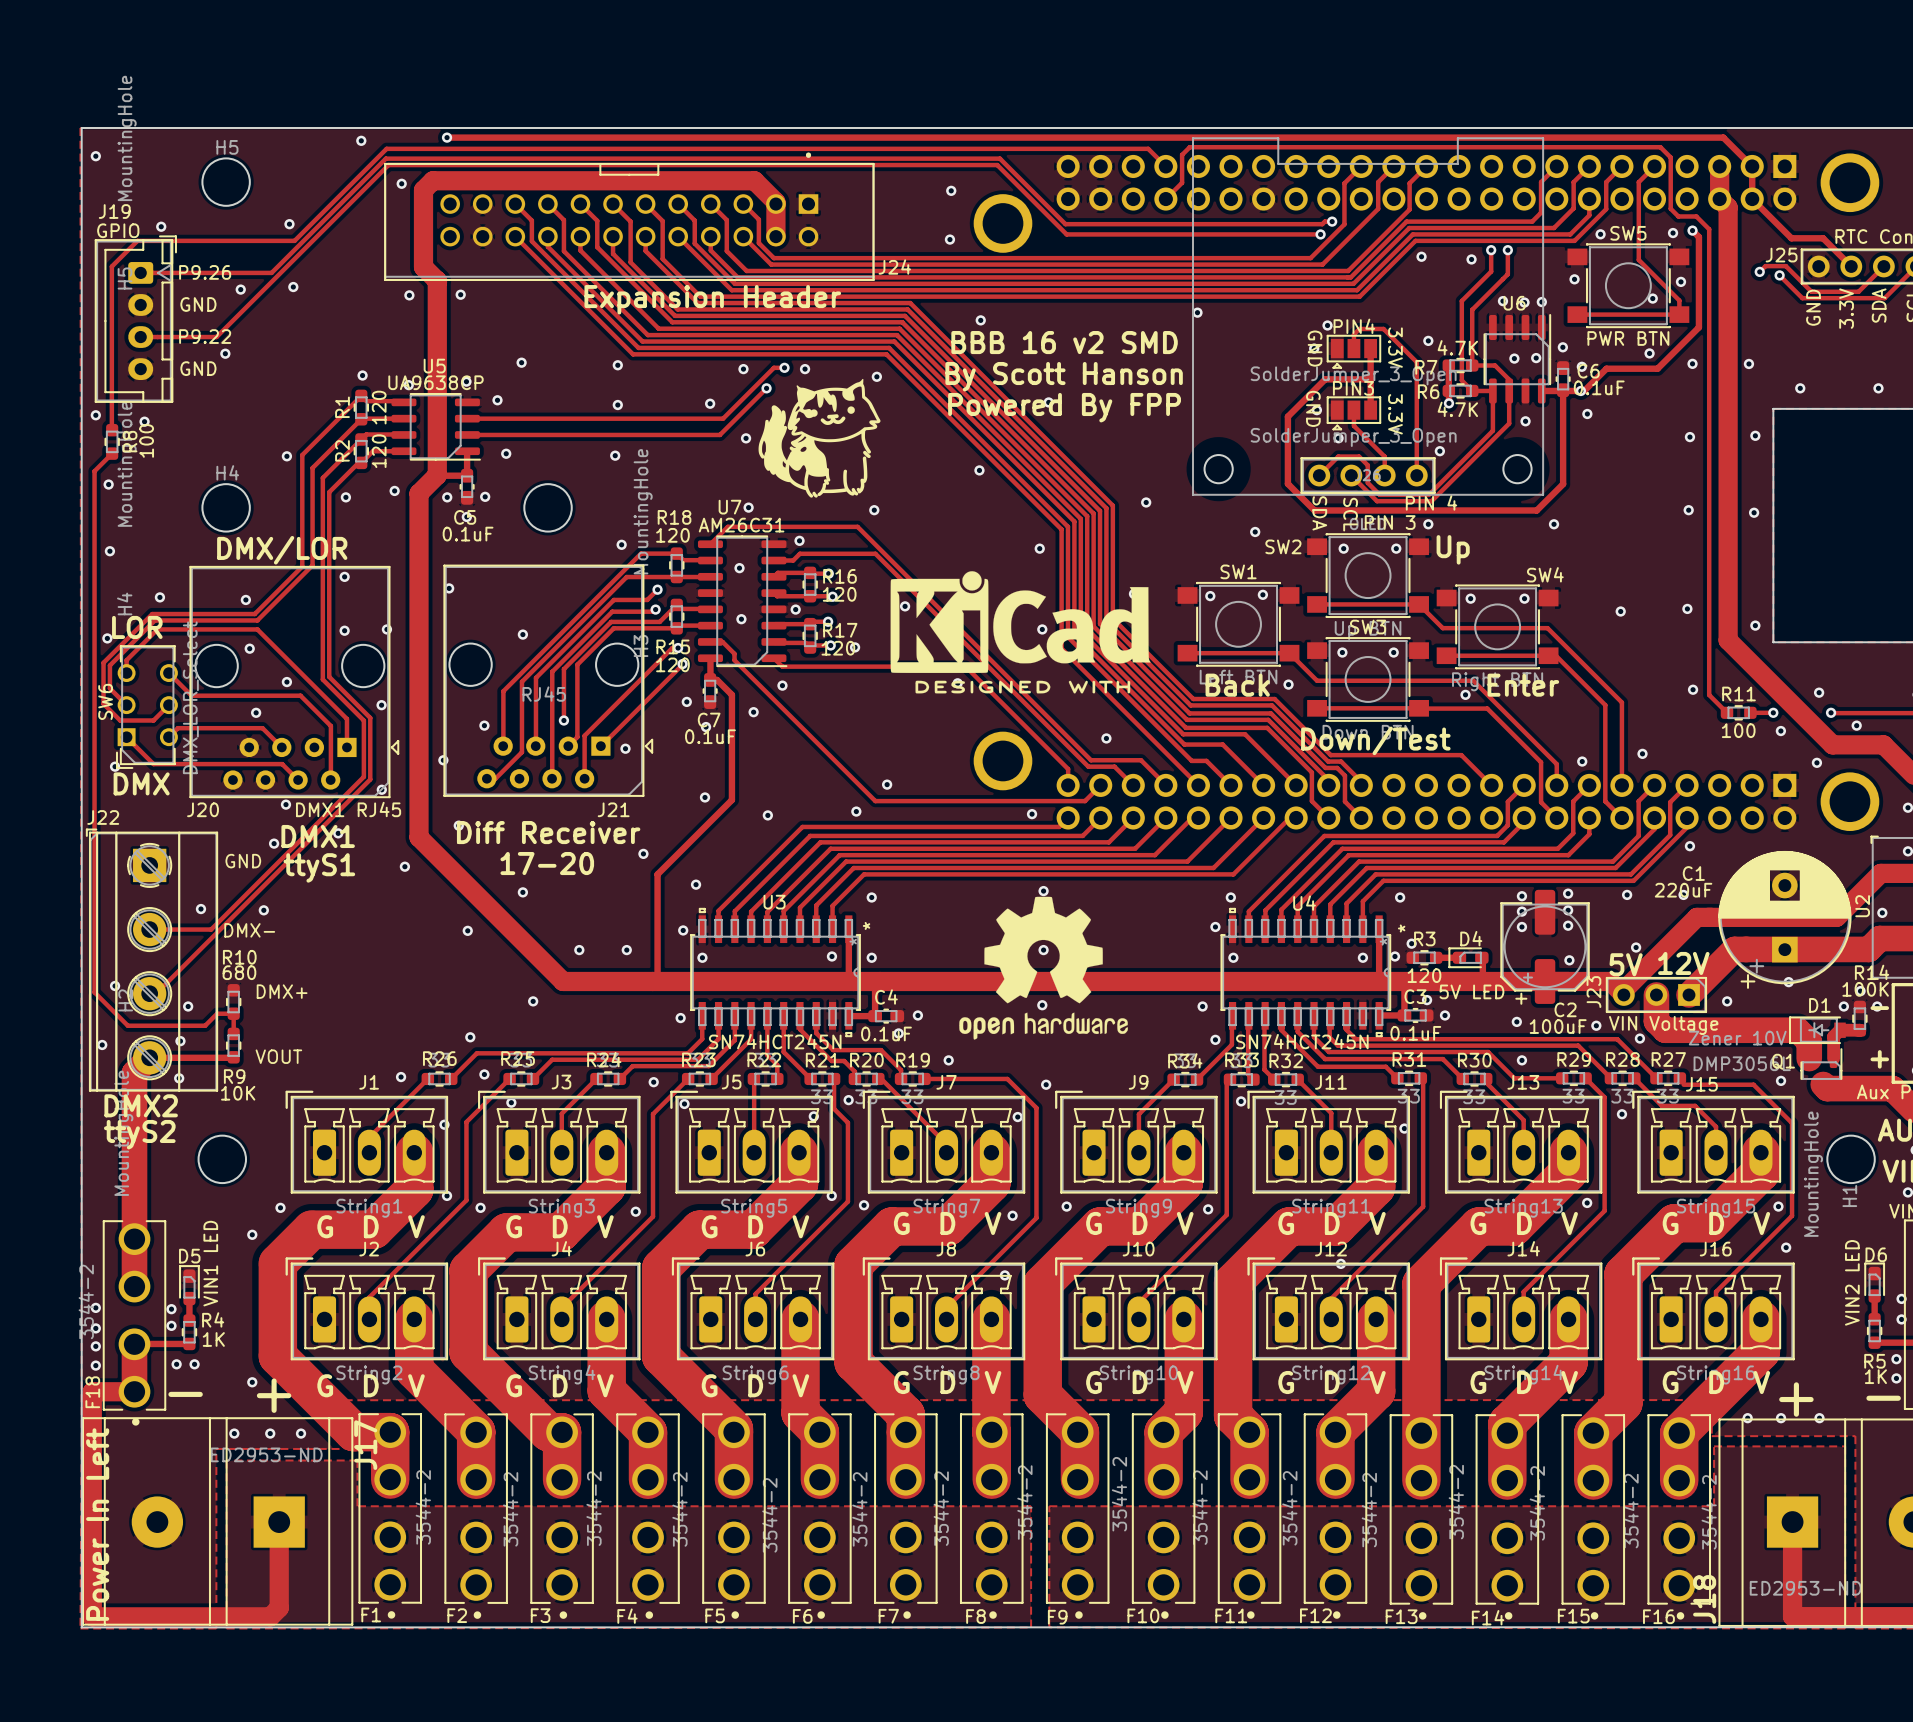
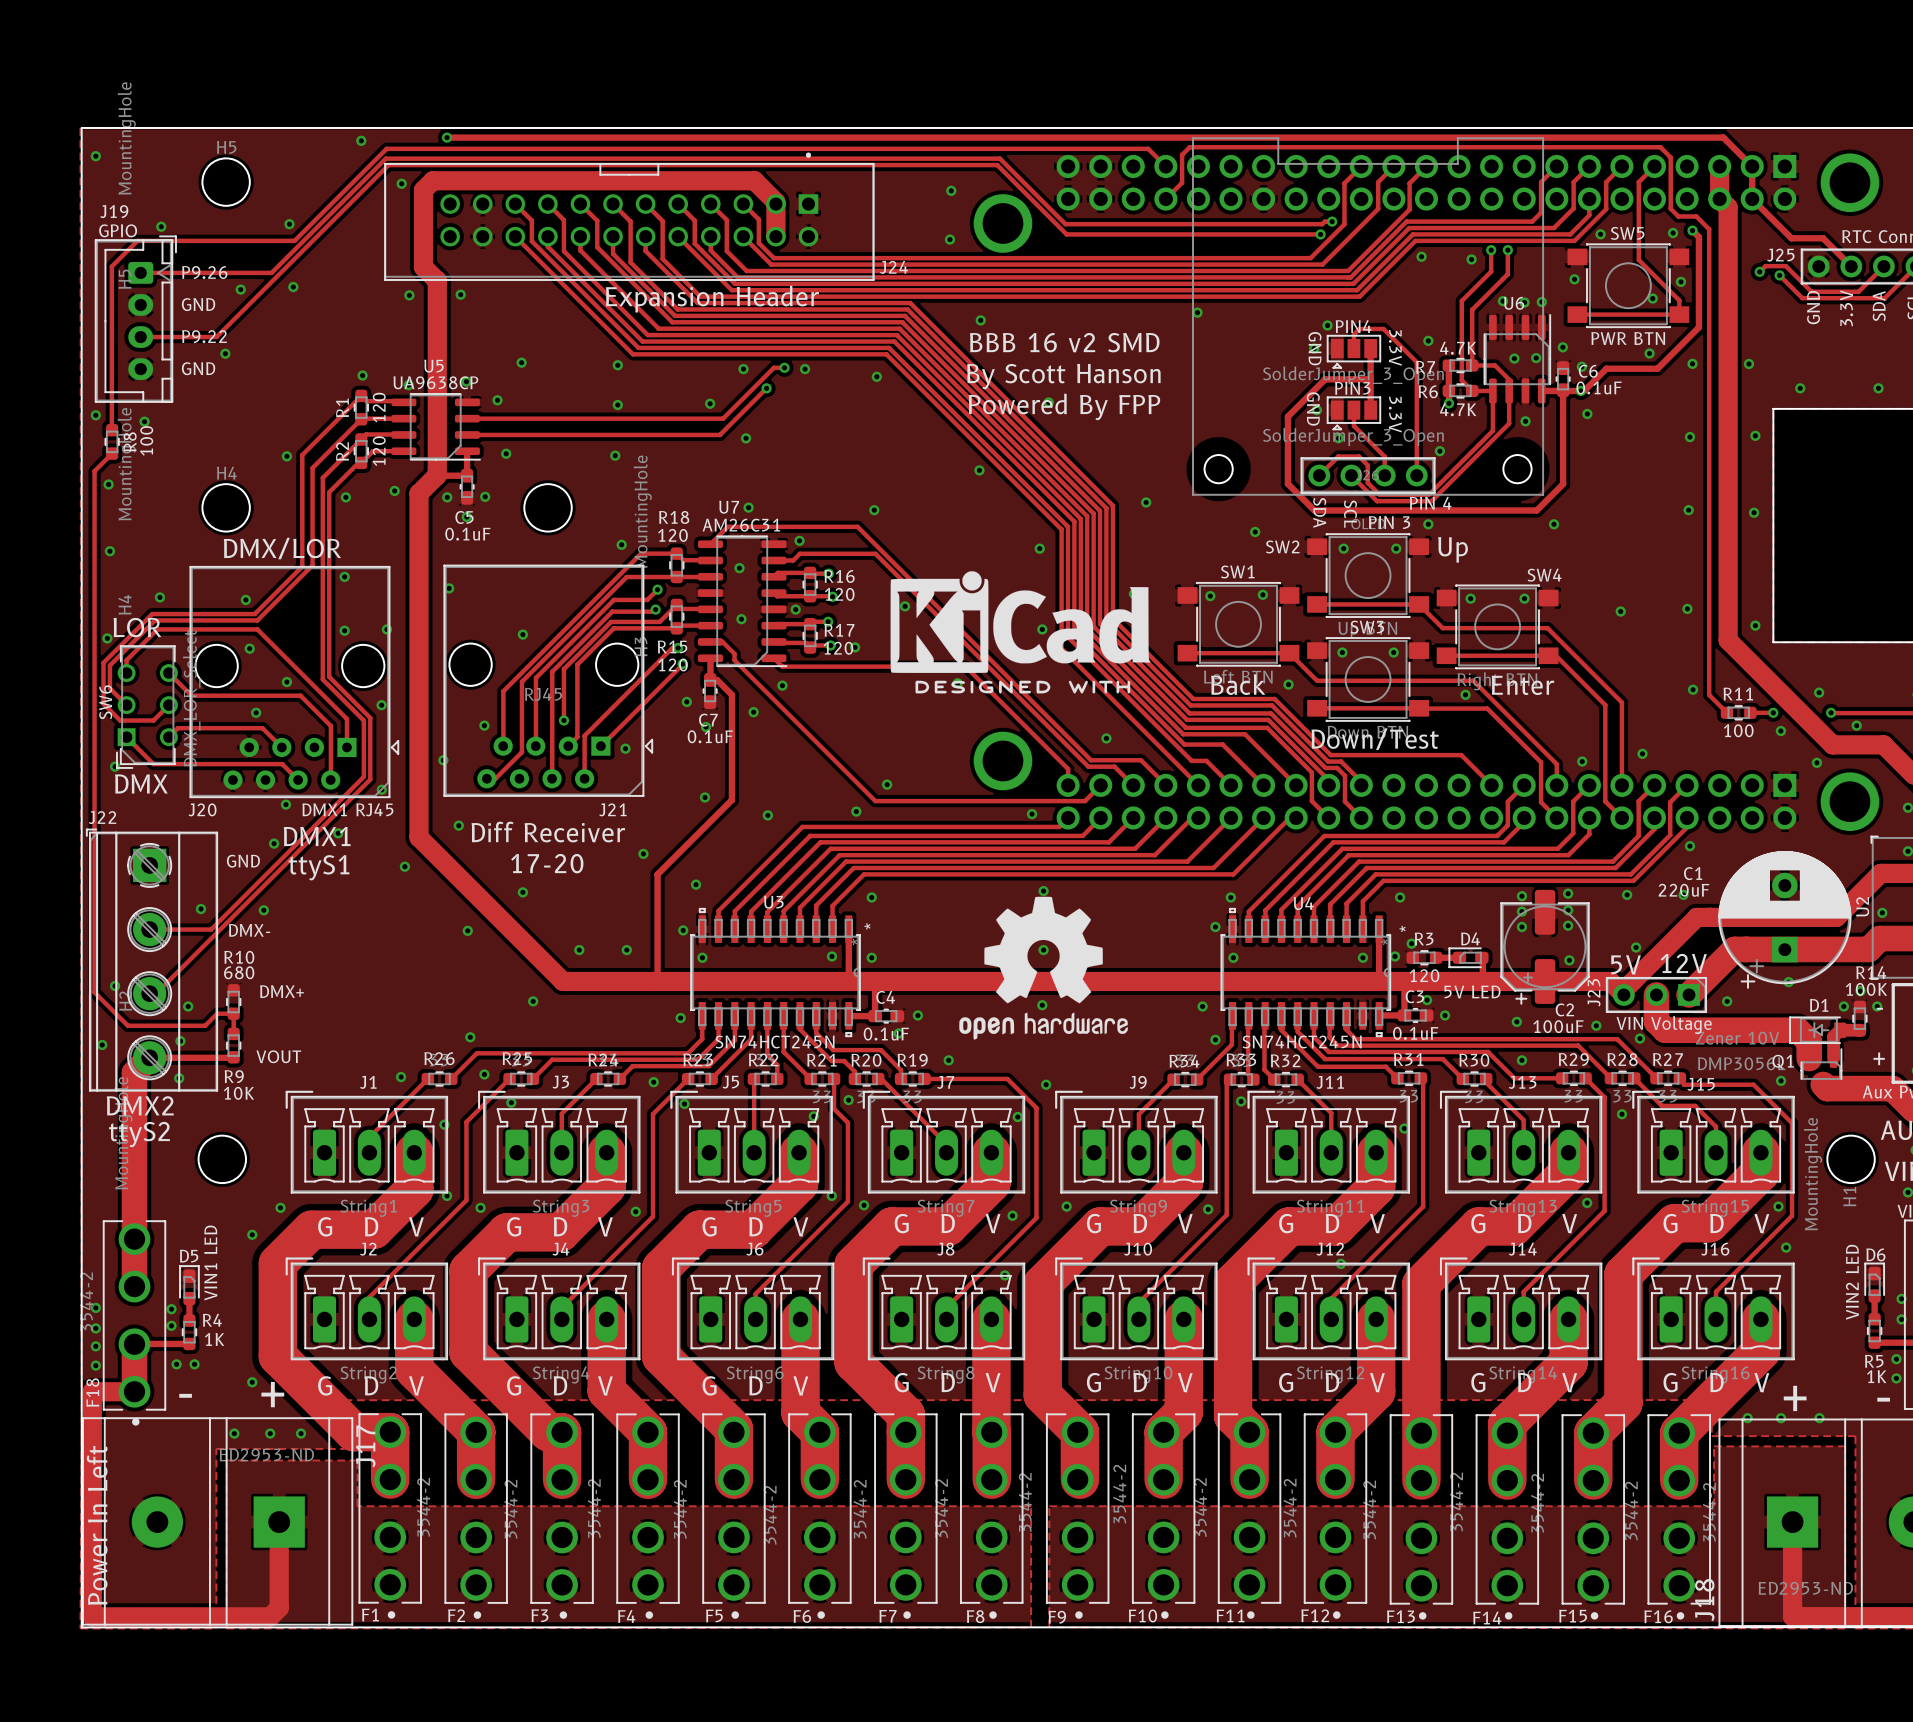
drawing: [758, 378, 881, 498] -> none

